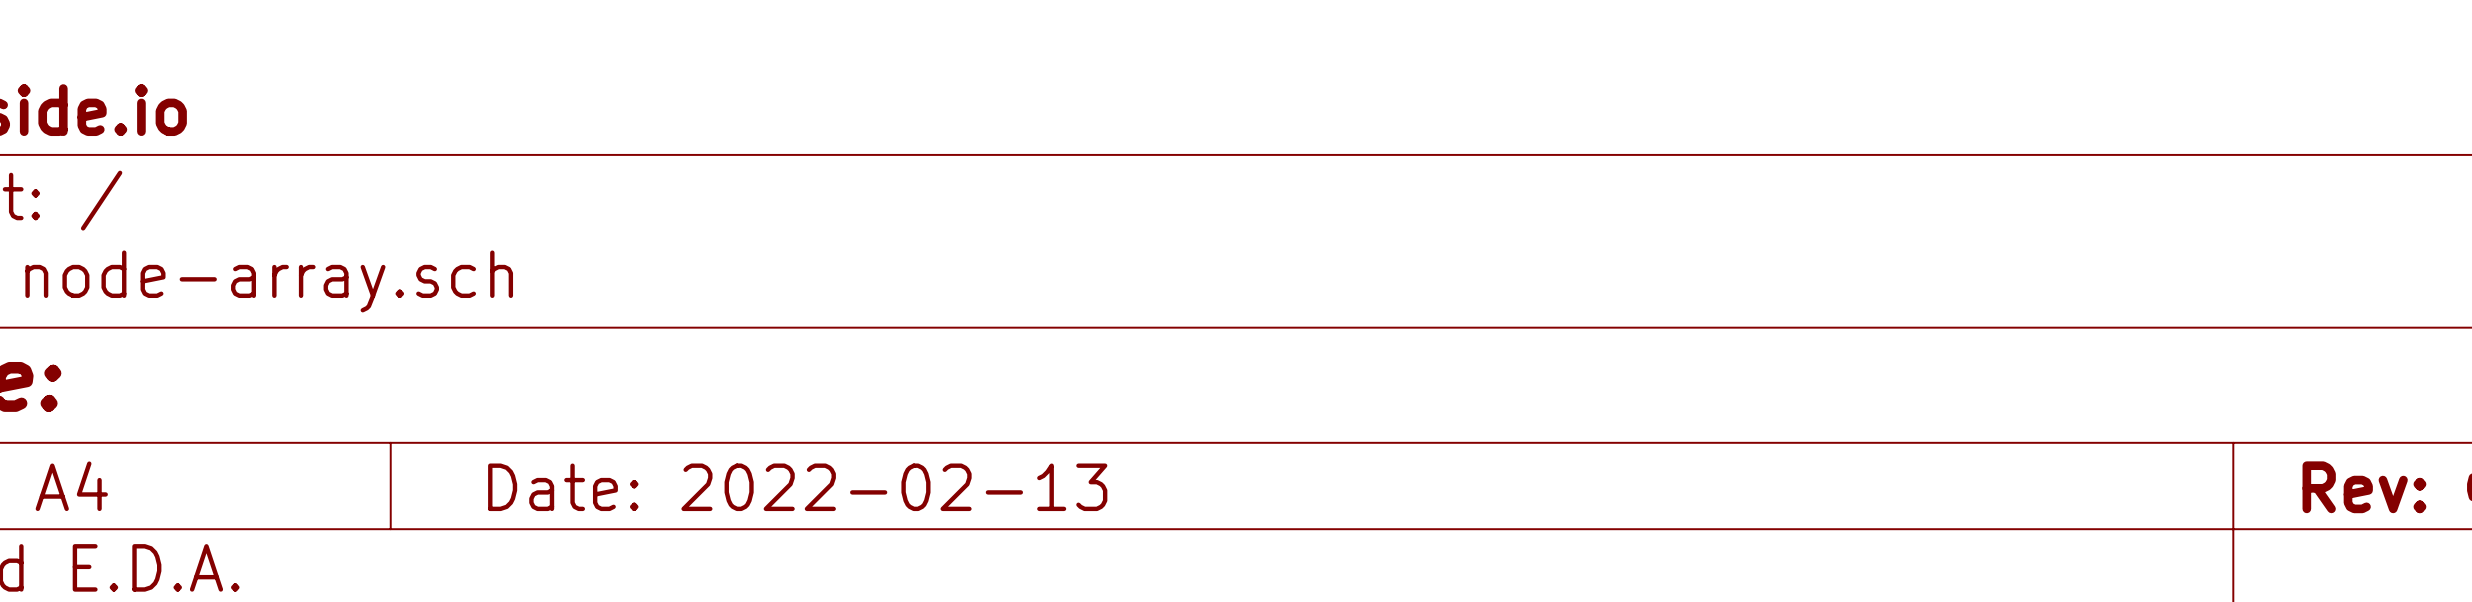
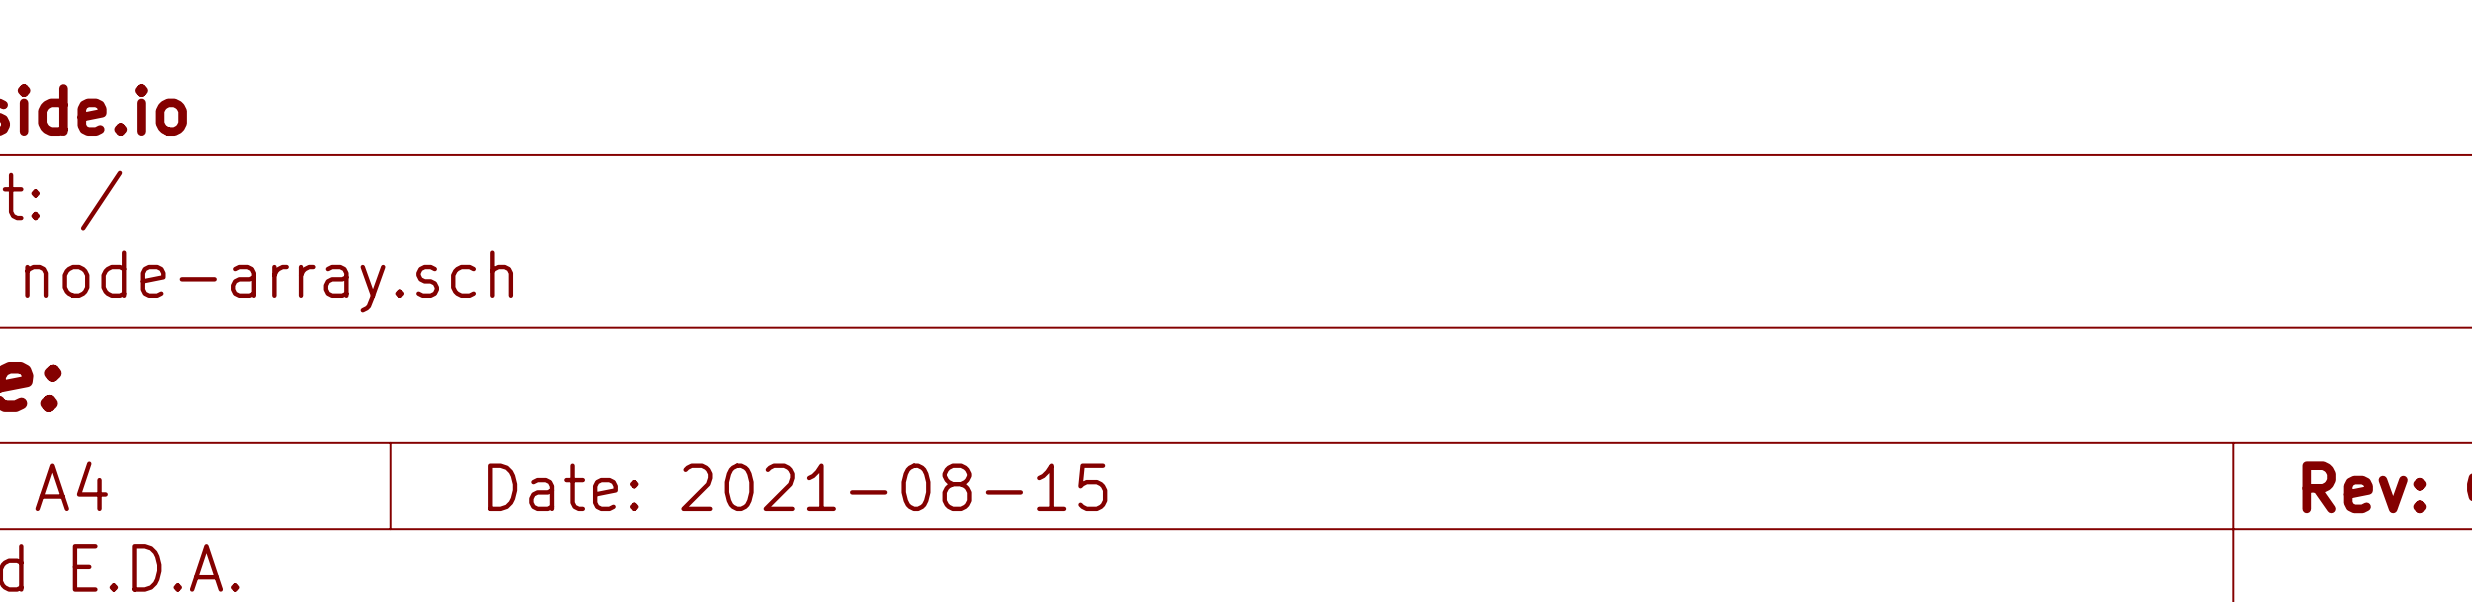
title block: Date: 2022-02-13 (797, 487) -> Date: 2021-08-15 (797, 487)

